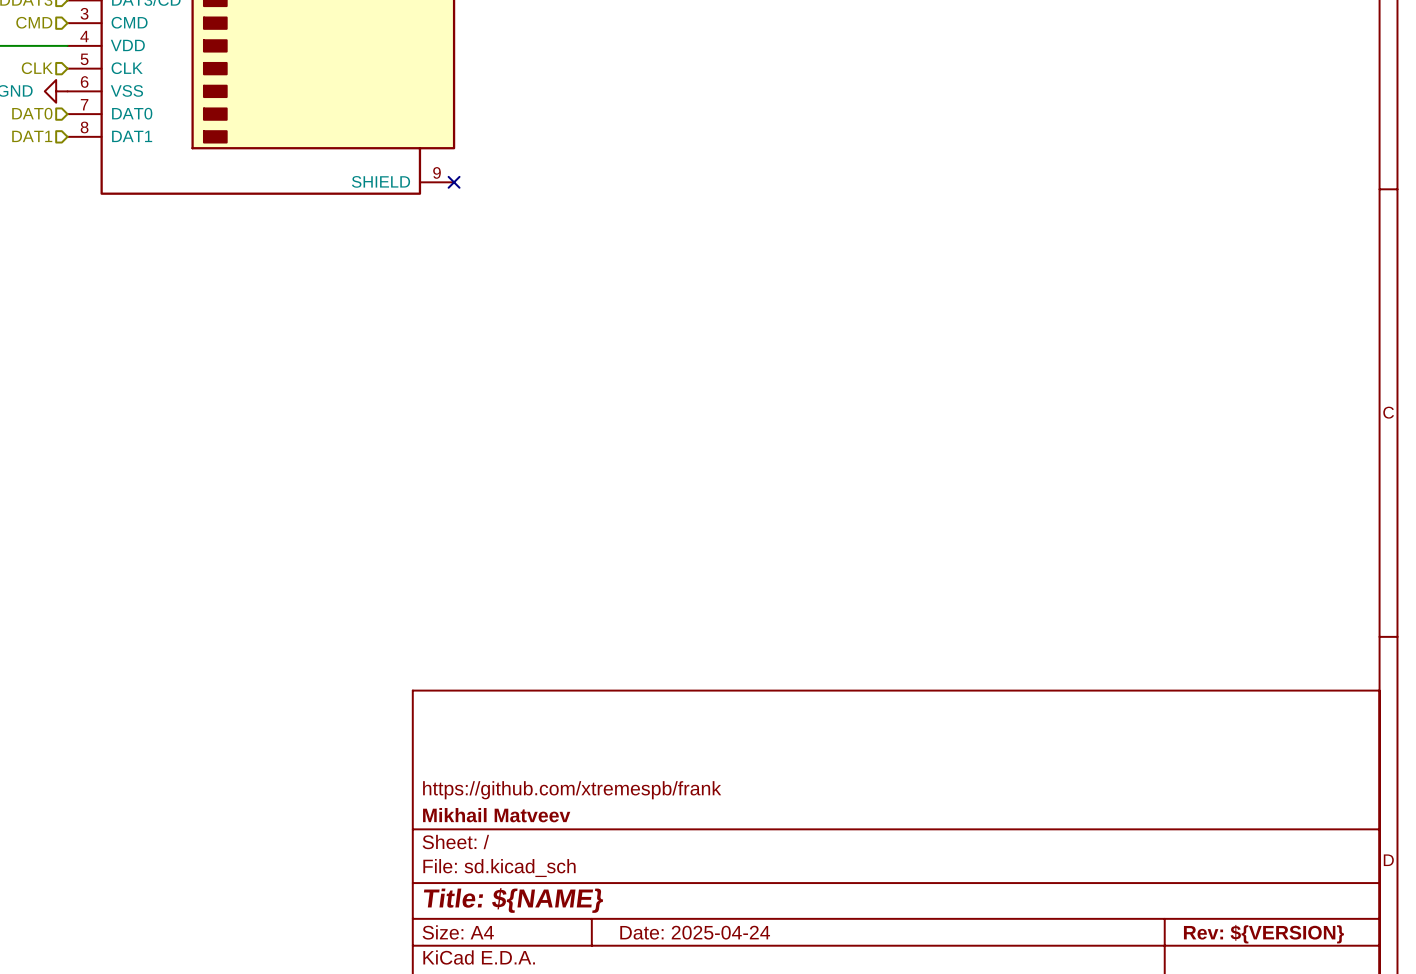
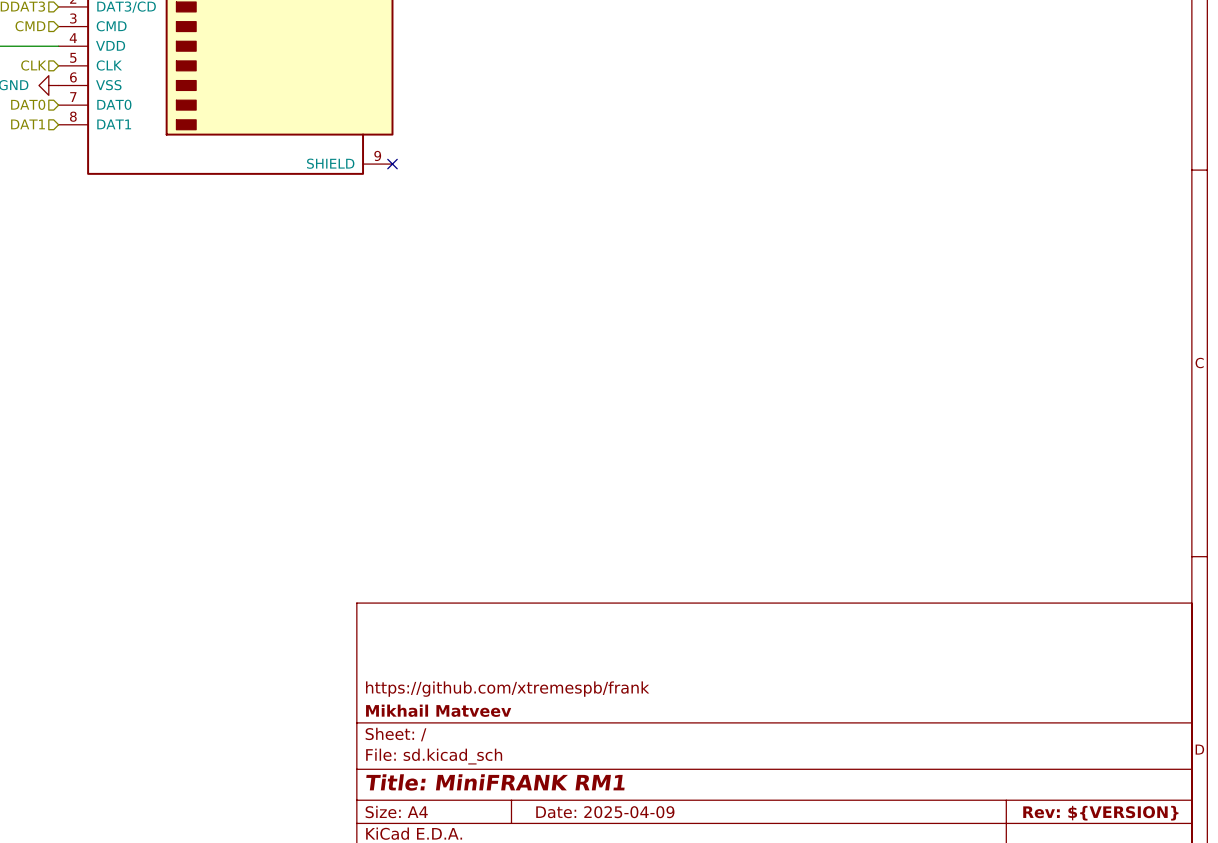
title block: Title: ${NAME} (513, 900) -> Title: MiniFRANK RM1 (495, 782)
title block: Date: 2025-04-24 (695, 932) -> Date: 2025-04-09 (605, 812)

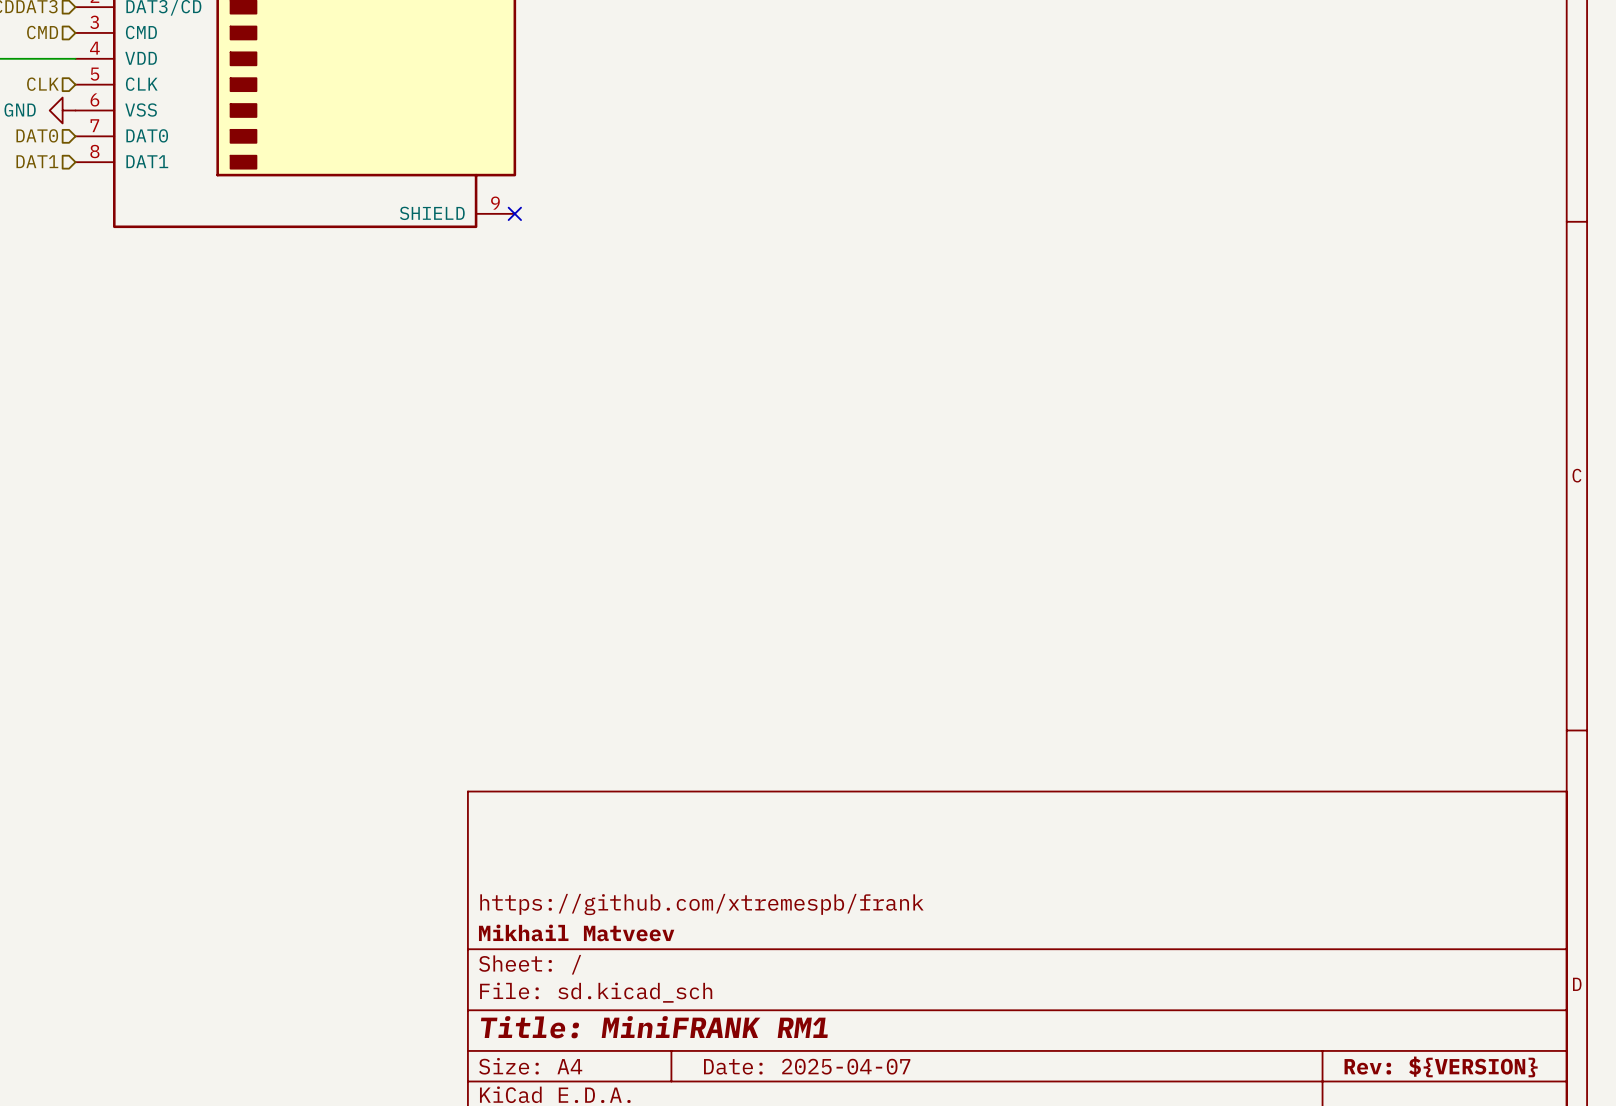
title block: Date: 2025-04-09 (605, 812) -> Date: 2025-04-07 (807, 1066)

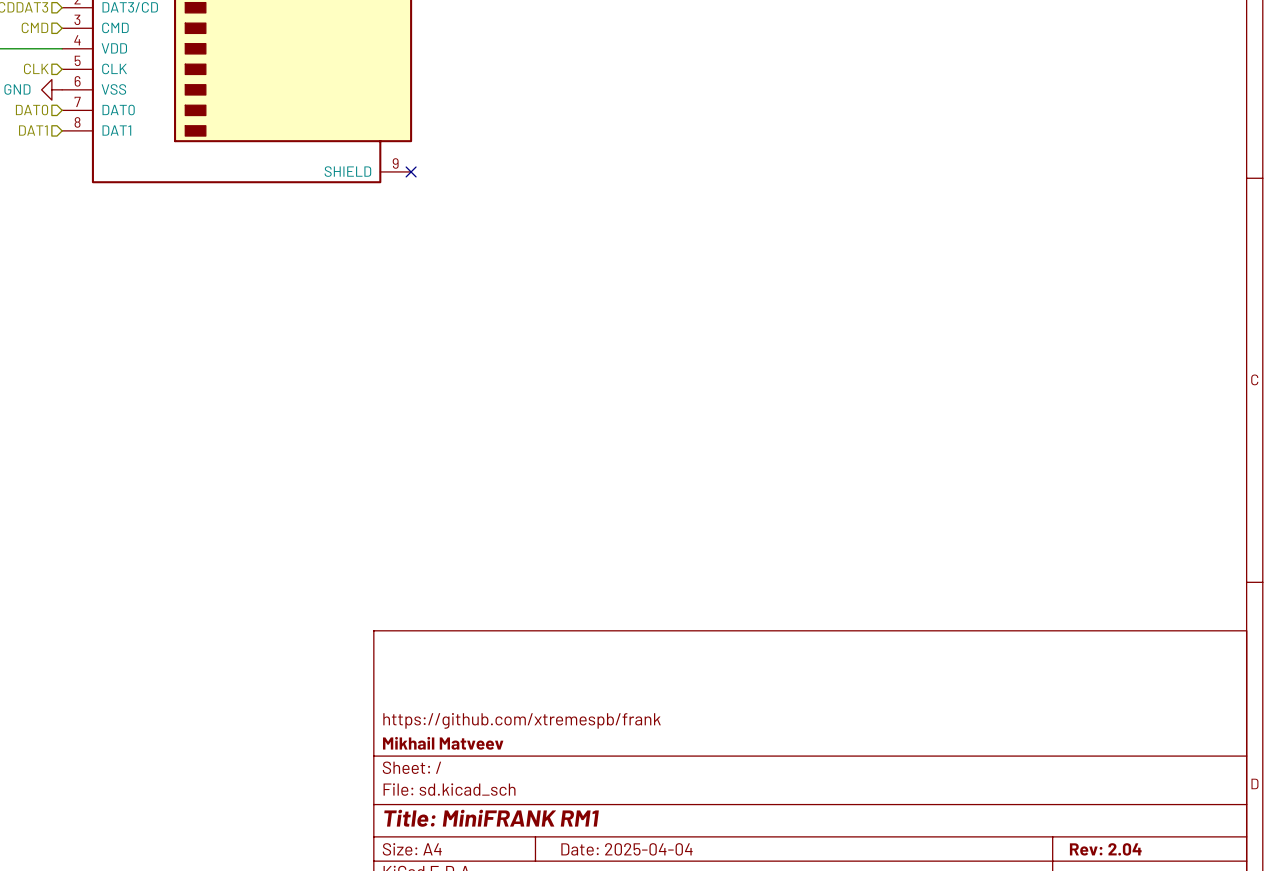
title block: Date: 2025-04-07 (807, 1066) -> Date: 2025-04-04 (626, 849)
title block: Rev: ${VERSION} (1441, 1066) -> Rev: 2.04 (1105, 849)

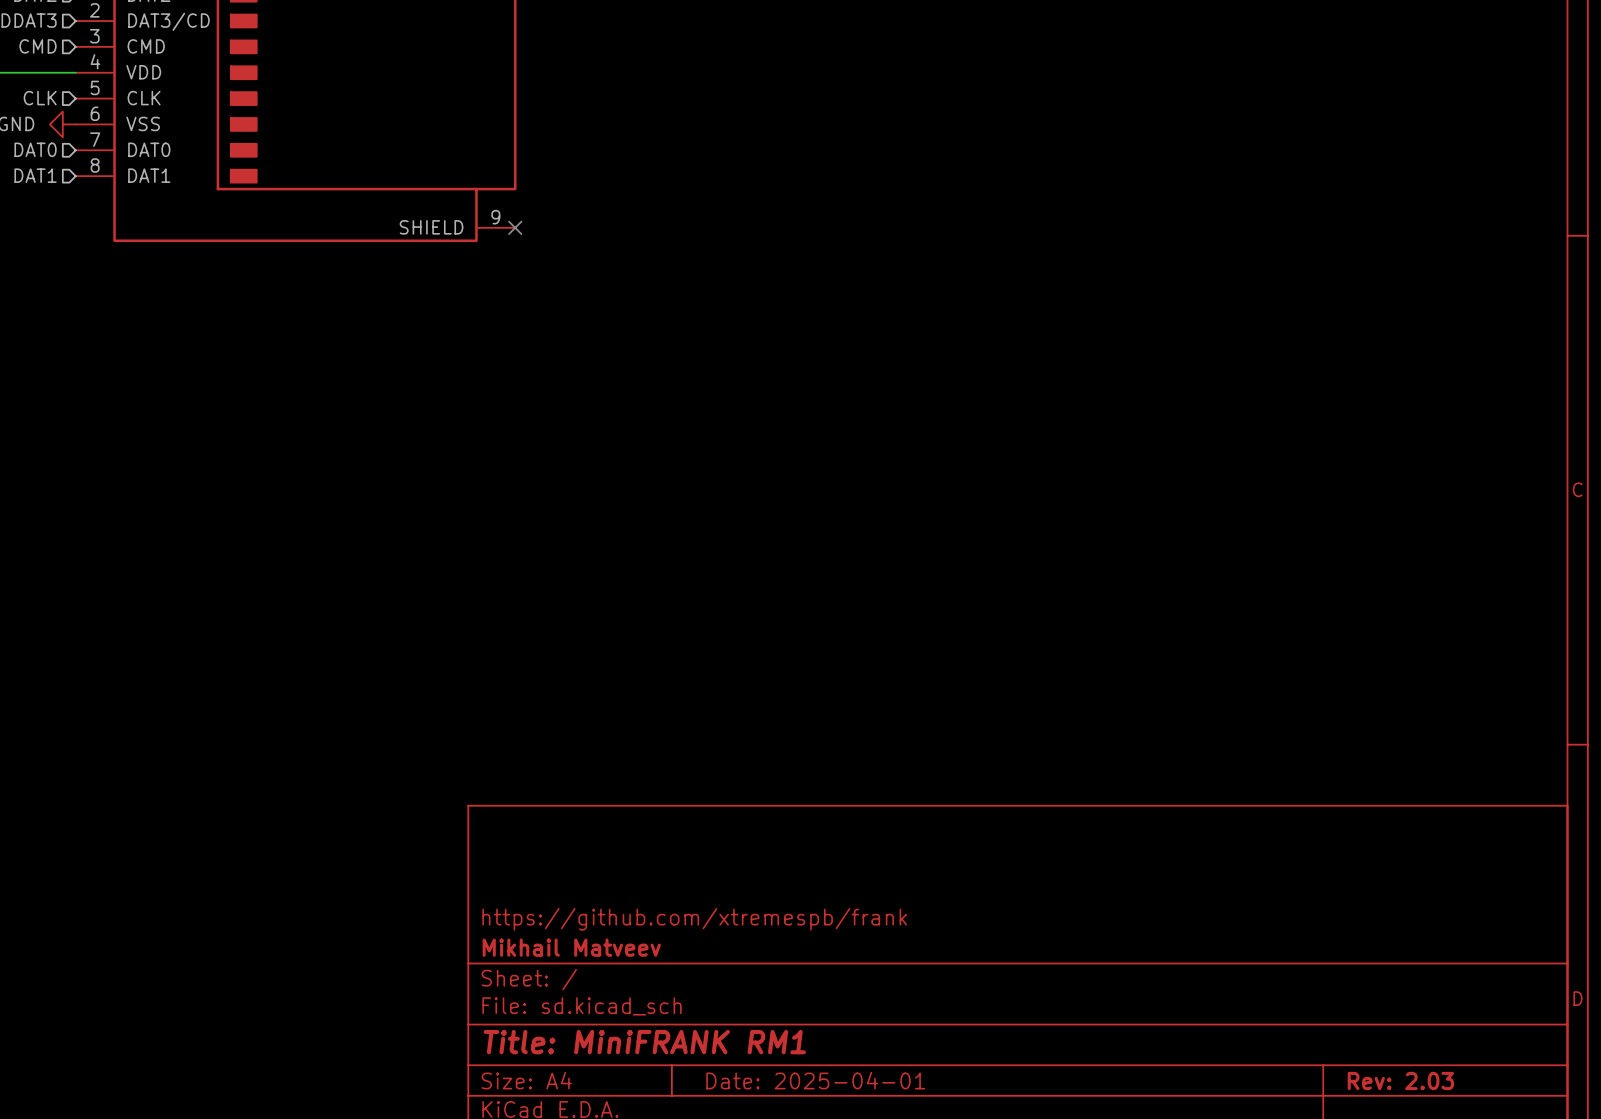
title block: Date: 2025-04-04 (626, 849) -> Date: 2025-04-01 (815, 1080)
title block: Rev: 2.04 (1105, 849) -> Rev: 2.03 (1400, 1080)

